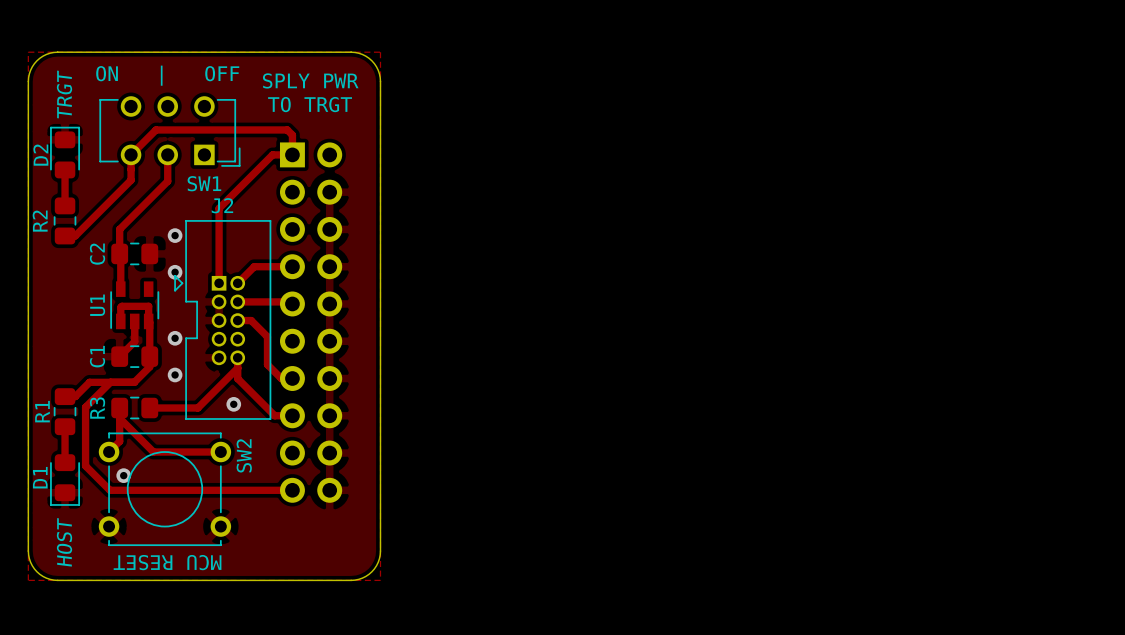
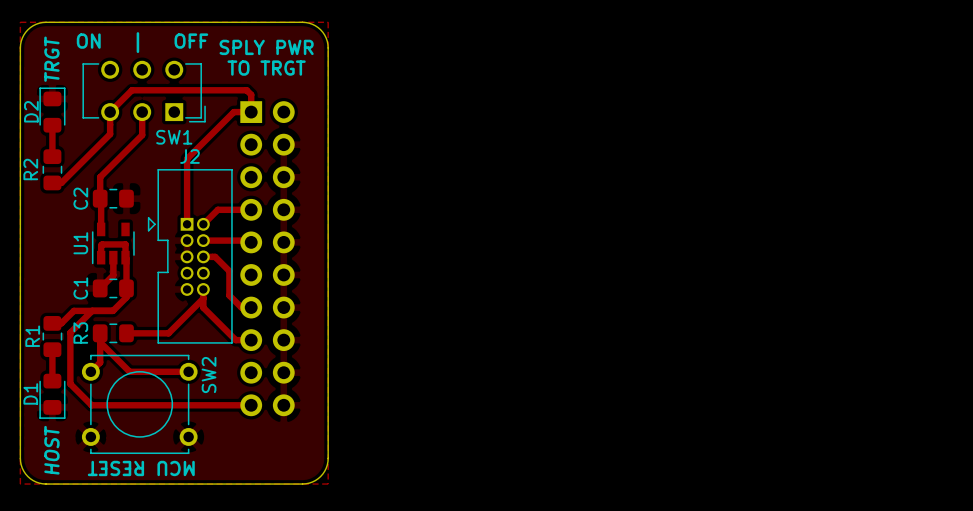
via: (175, 235) -> none
via: (175, 272) -> none
via: (175, 338) -> none
via: (175, 374) -> none
via: (233, 404) -> none
via: (123, 475) -> none

